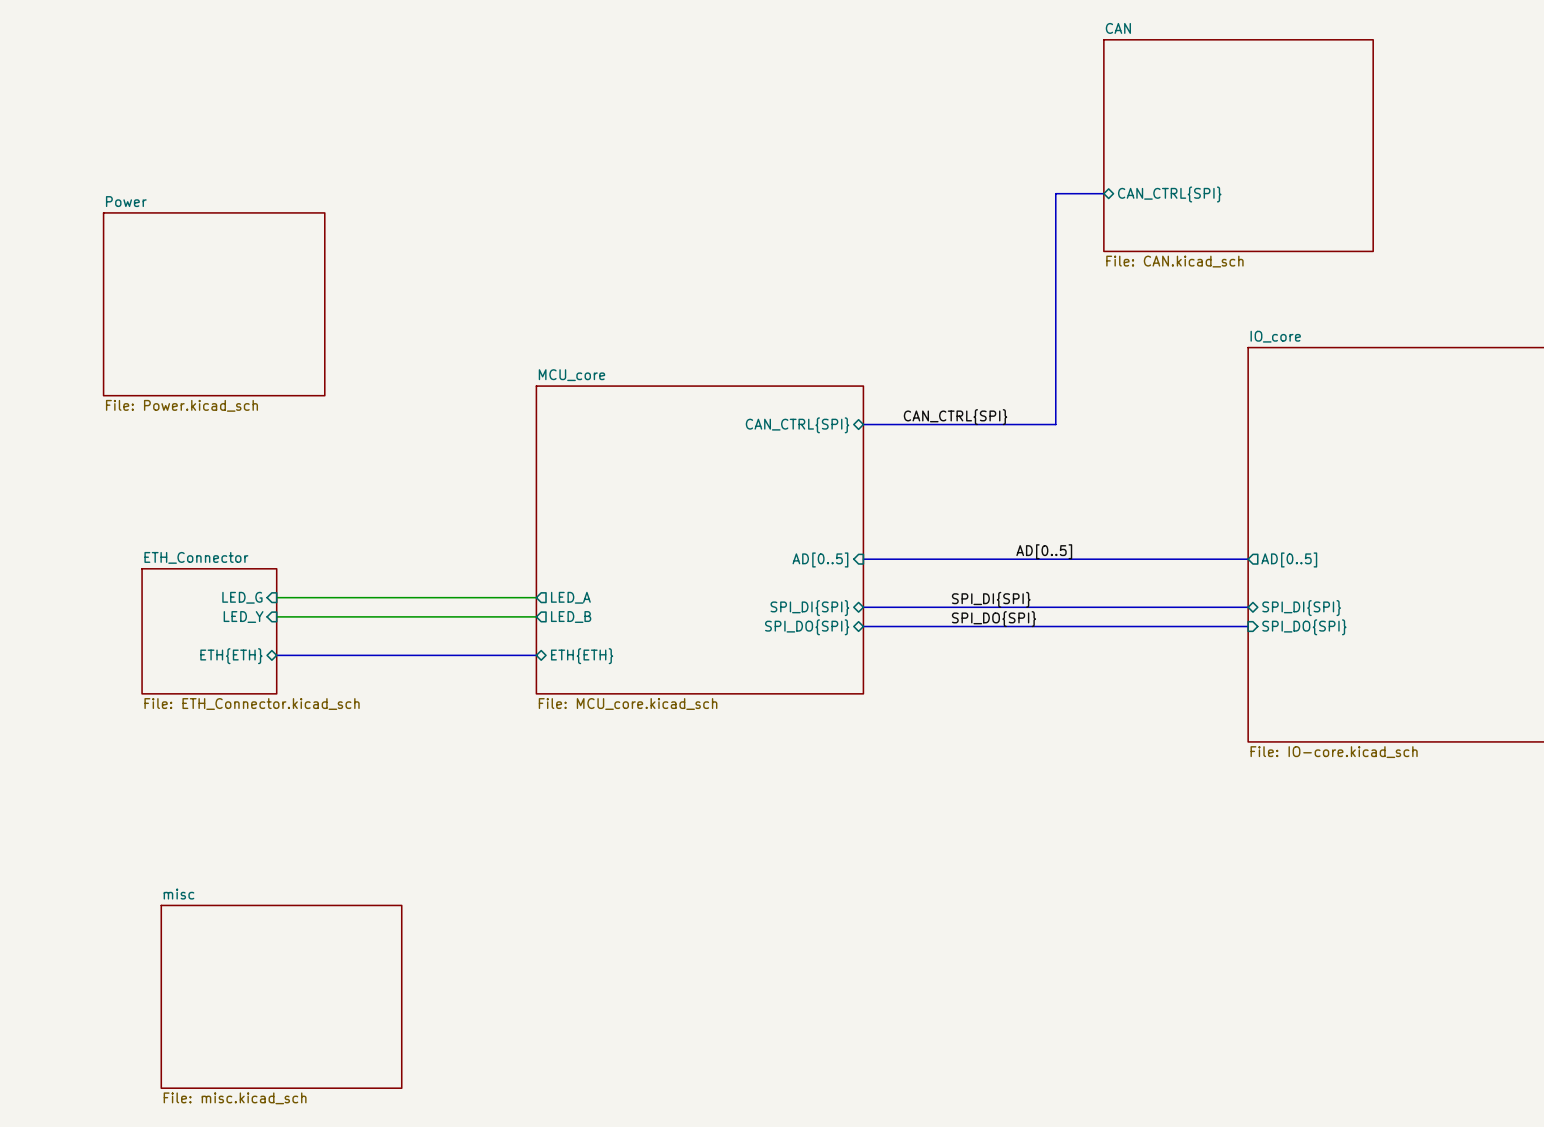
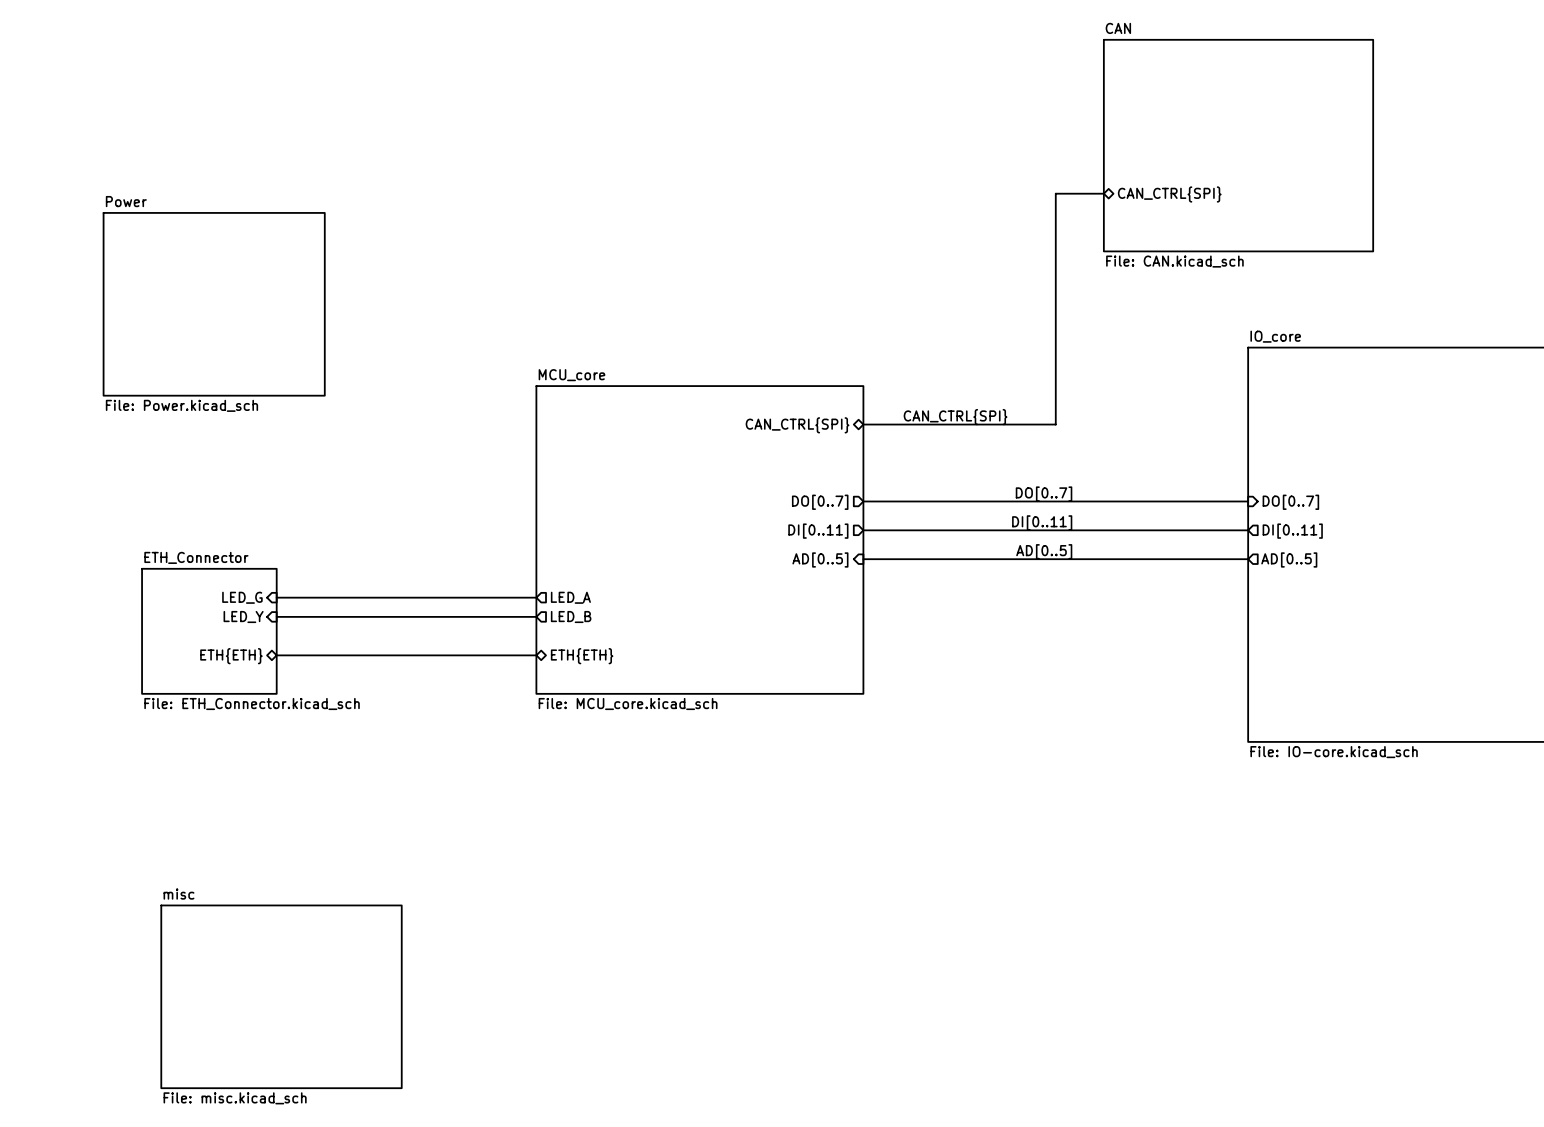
label: none -> DO[0..7] (1044, 494)
sheet pin: none -> DO[0..7] (820, 502)
sheet pin: none -> DO[0..7] (1290, 502)
label: none -> DI[0..11] (1042, 522)
sheet pin: none -> DI[0..11] (818, 531)
sheet pin: none -> DI[0..11] (1292, 531)
label: SPI_DI{SPI} (991, 599) -> none
bus: (863, 607) (1248, 607) -> (863, 530) (1248, 530)
sheet pin: SPI_DI{SPI} (809, 608) -> none
sheet pin: SPI_DI{SPI} (1301, 608) -> none
label: SPI_DO{SPI} (994, 619) -> none
bus: (863, 626) (1248, 626) -> (863, 501) (1248, 501)
sheet pin: SPI_DO{SPI} (807, 627) -> none
sheet pin: SPI_DO{SPI} (1304, 627) -> none

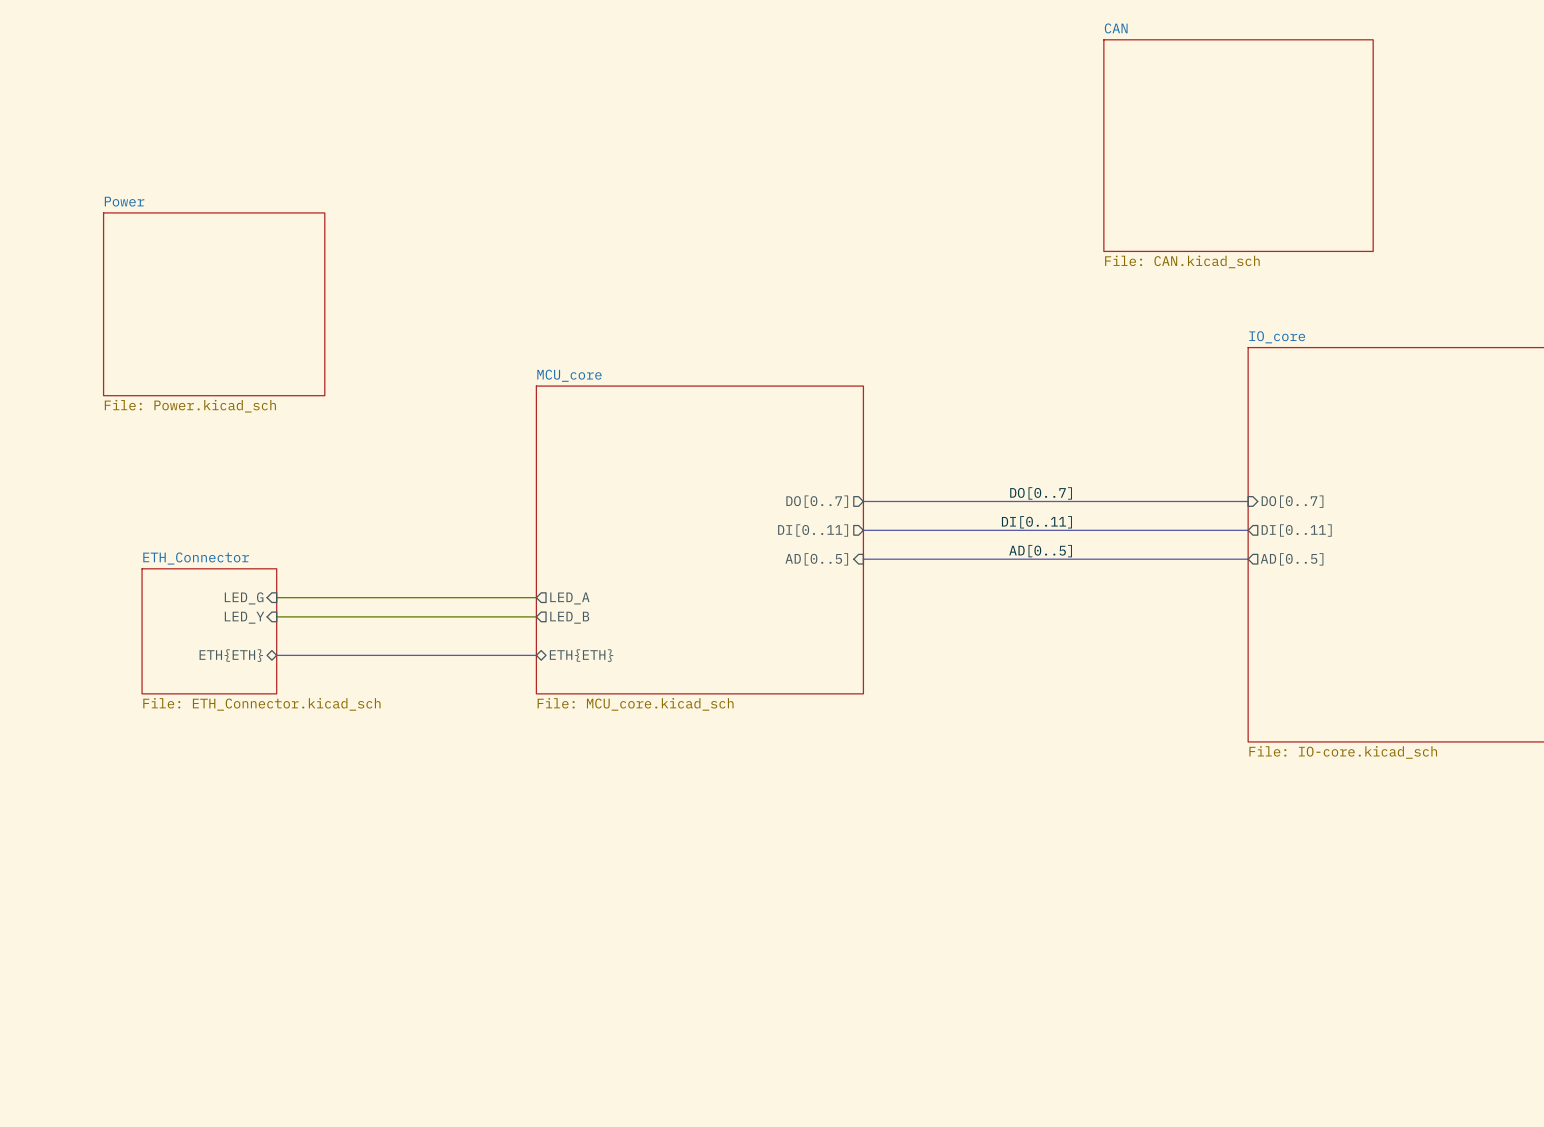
bus: (1103, 193) (1055, 193) (1055, 424) (863, 424) -> none
sheet pin: CAN_CTRL{SPI} (1169, 194) -> none
label: CAN_CTRL{SPI} (955, 417) -> none
sheet pin: CAN_CTRL{SPI} (797, 425) -> none
sheet misc: File: misc.kicad_sch (281, 996) -> none

